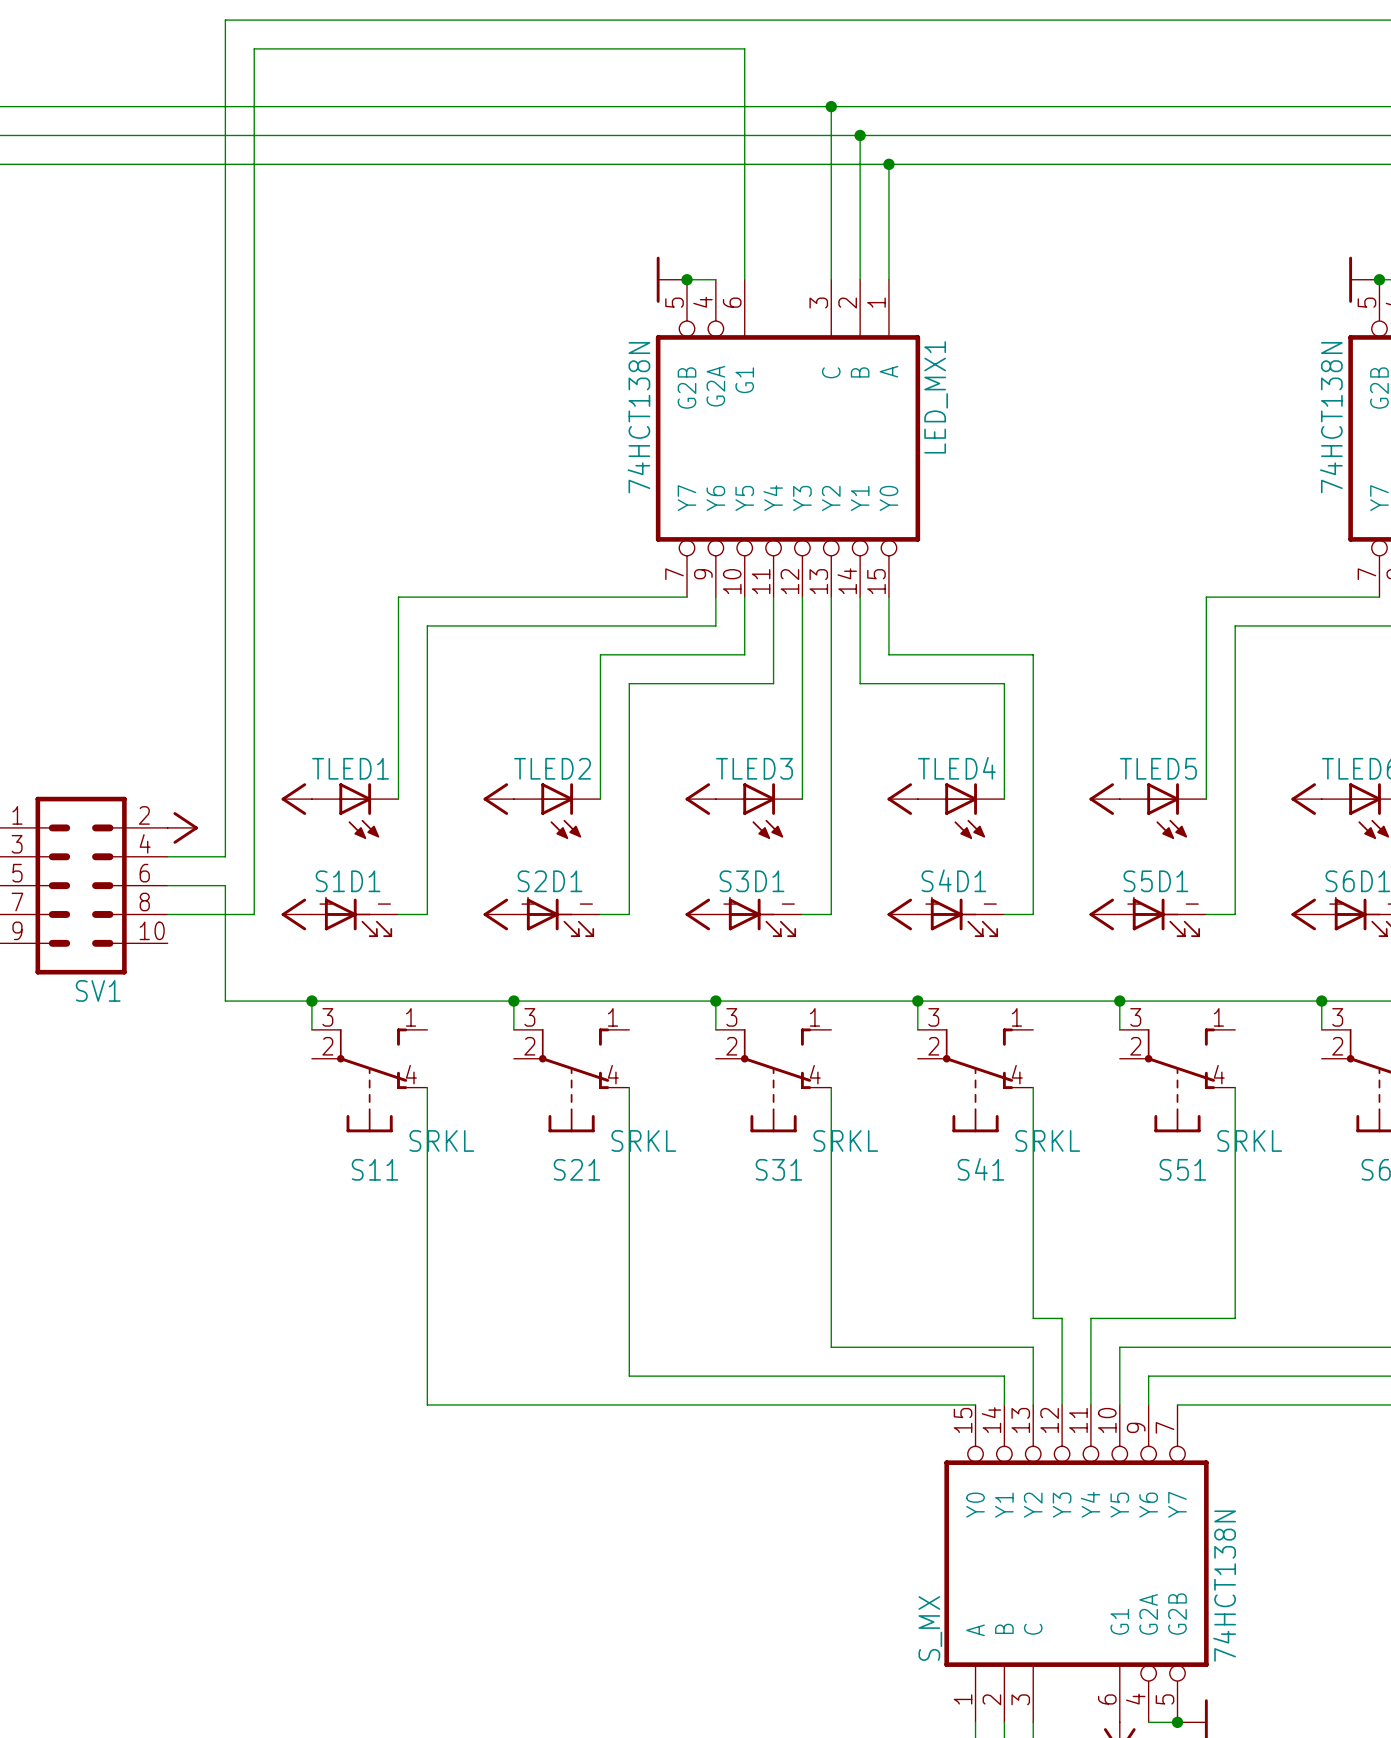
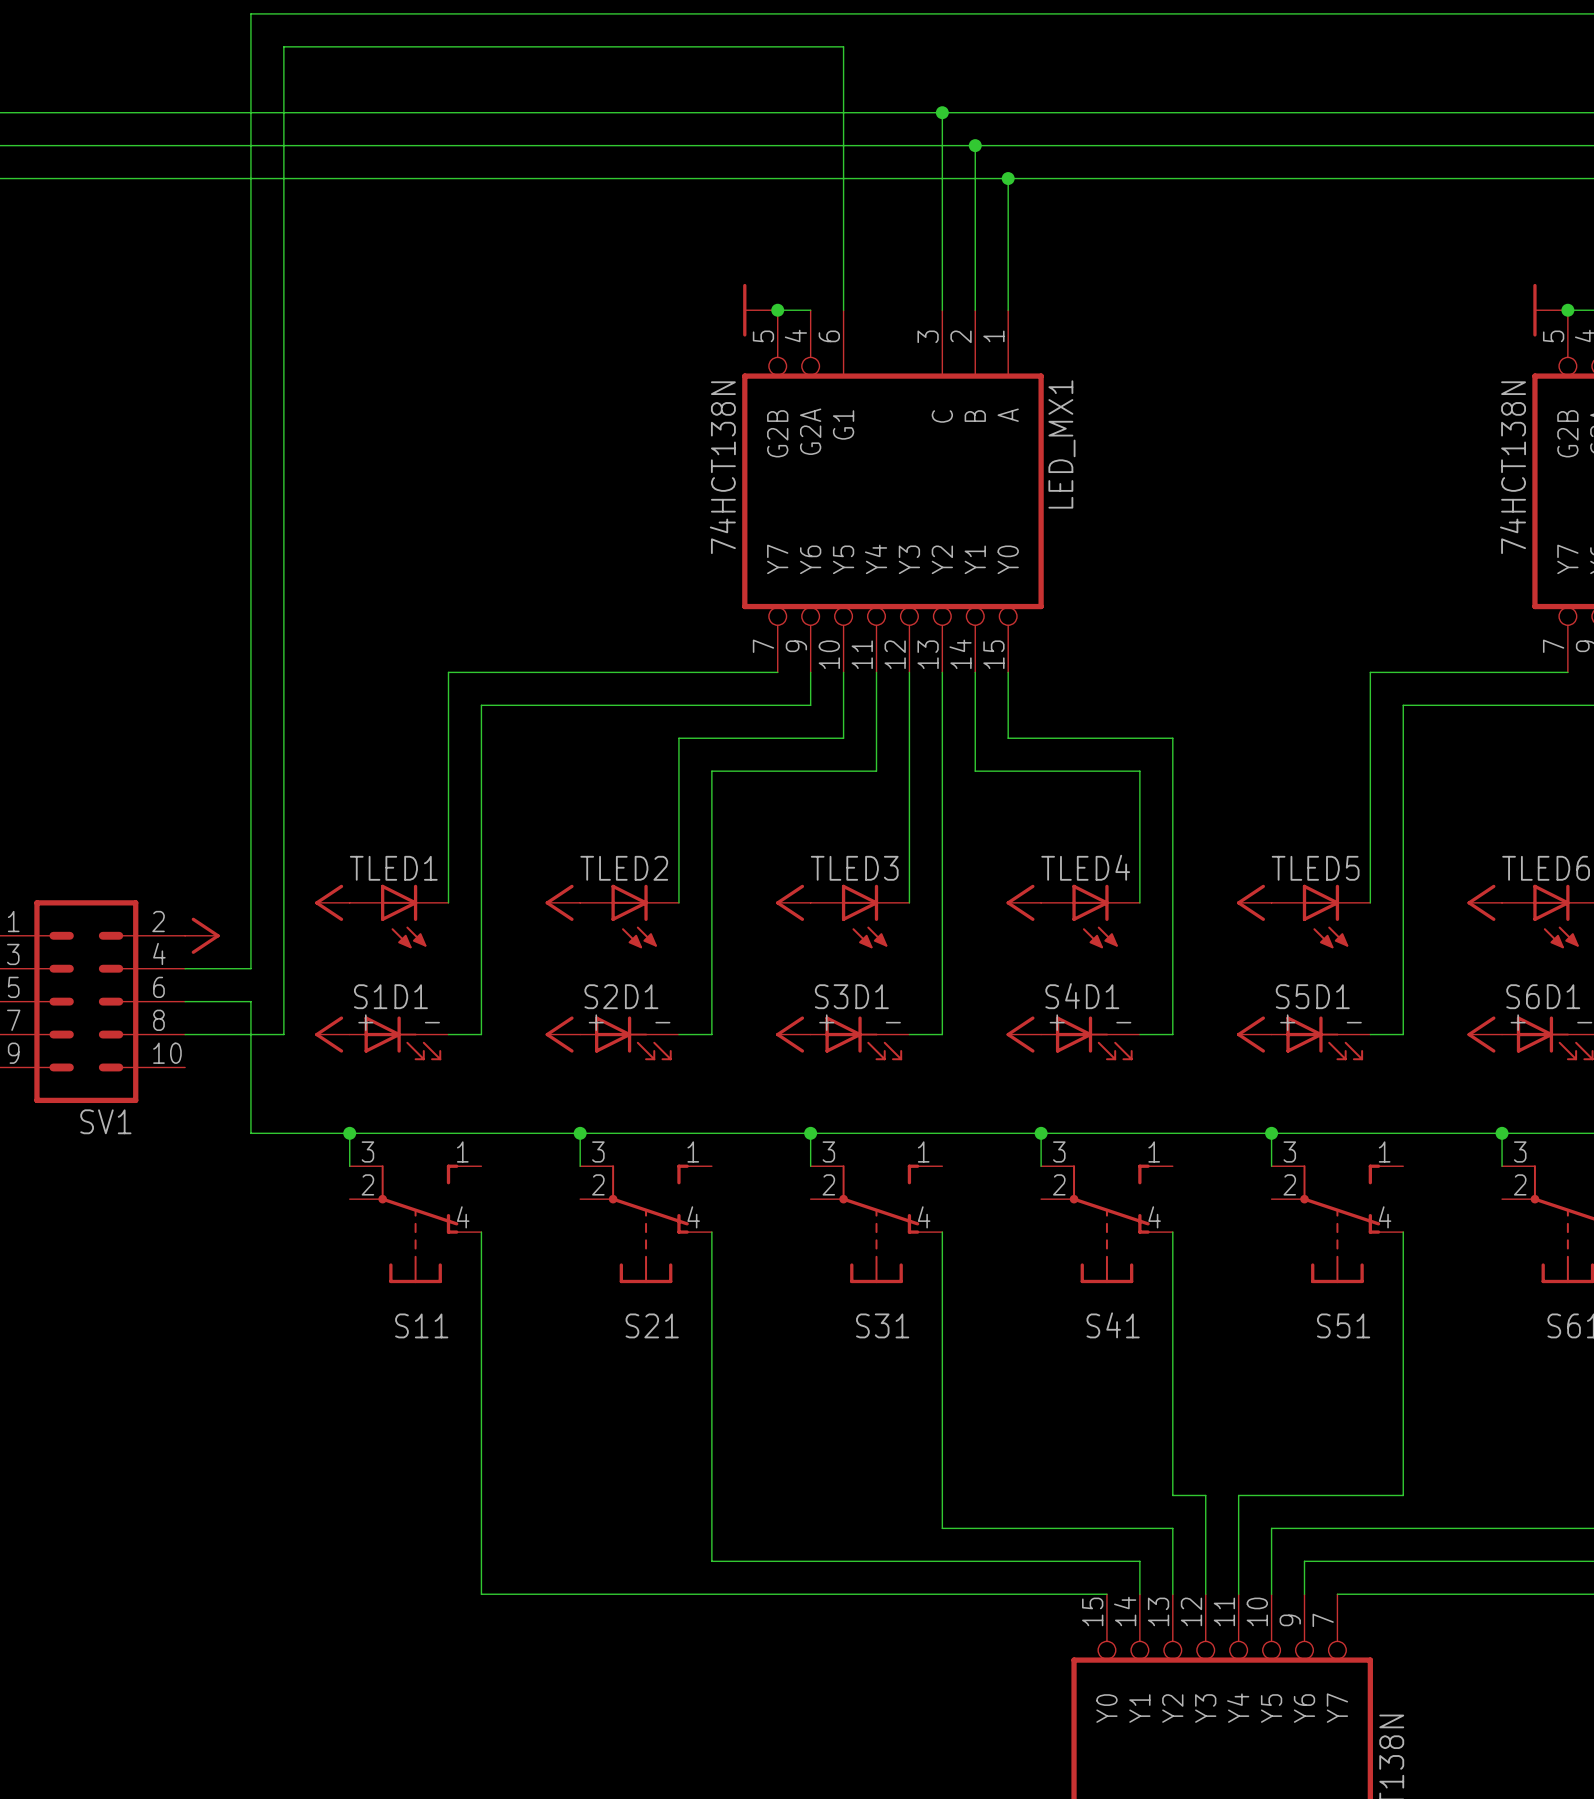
S11 value: SRKL (441, 1140) -> none
S21 value: SRKL (643, 1140) -> none
S31 value: SRKL (845, 1140) -> none
S41 value: SRKL (1047, 1140) -> none
S51 value: SRKL (1249, 1140) -> none

